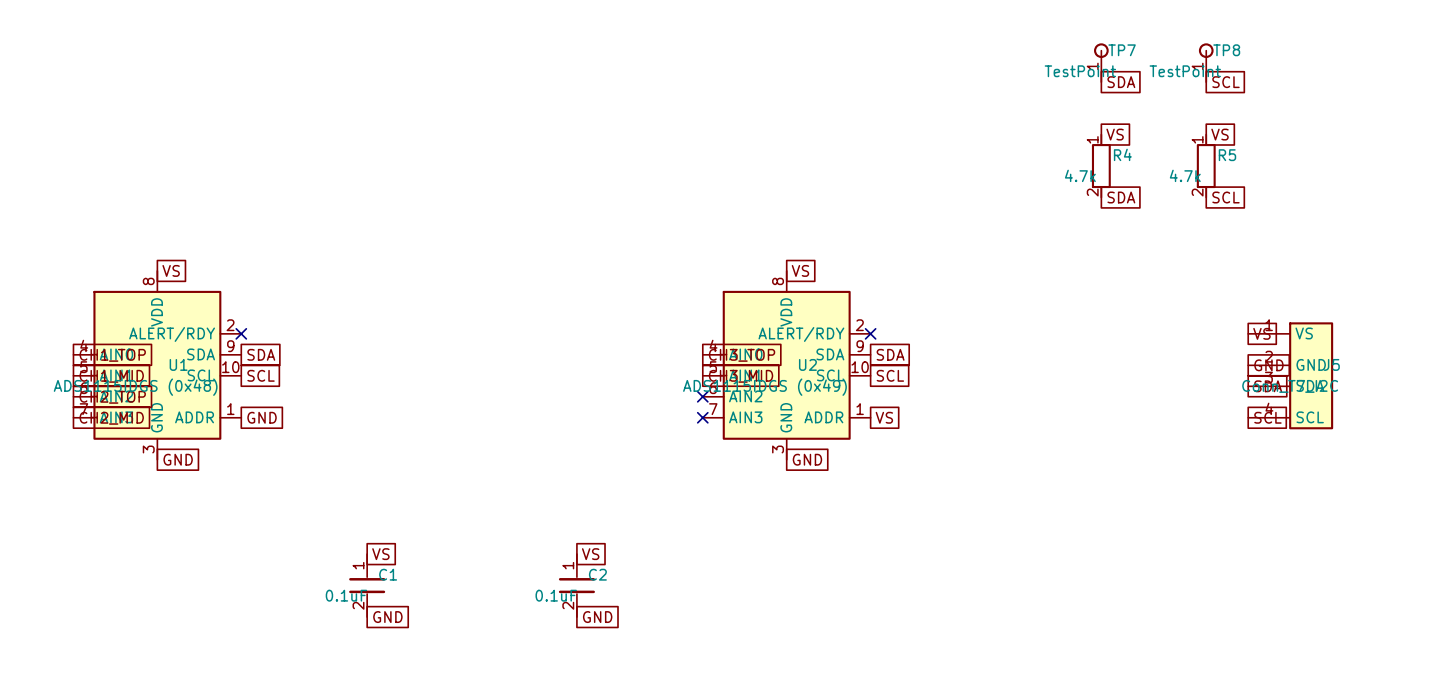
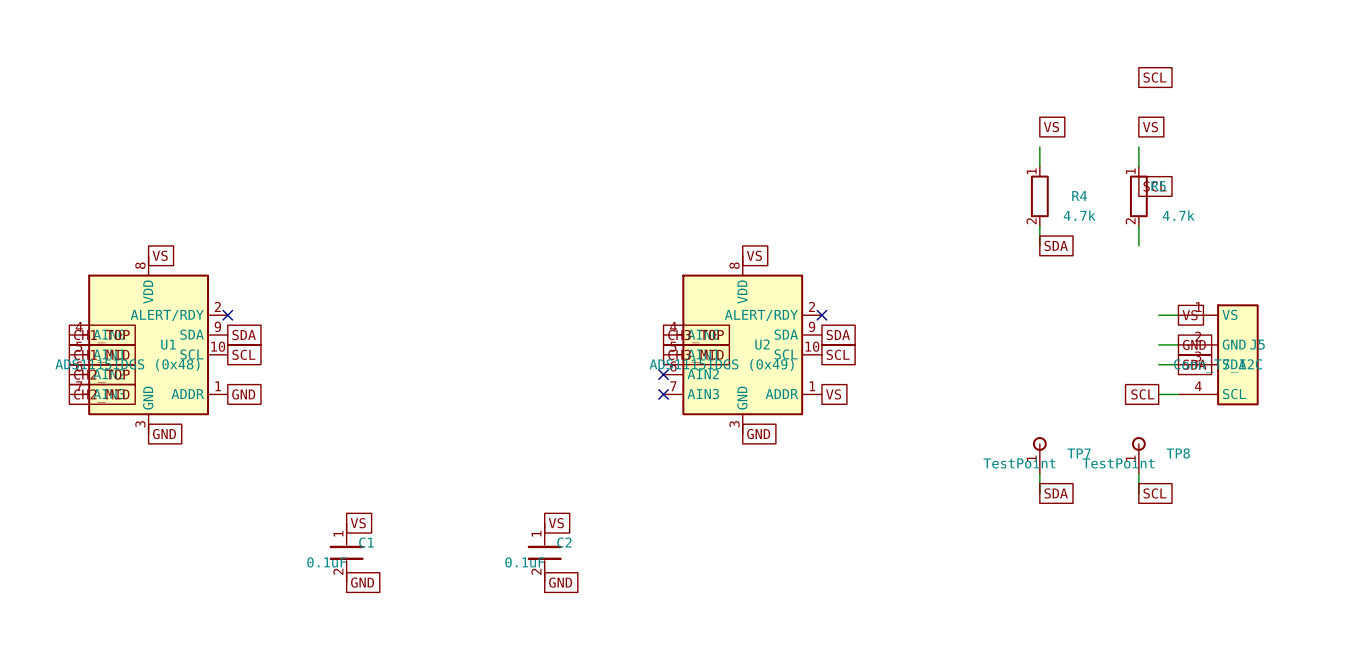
TP7 name position: TP7 (1122, 50) -> TP7 (1079, 453)
TP8 name position: TP8 (1226, 50) -> TP8 (1178, 453)
TP7 position: (1101, 62) -> (1039, 455)
TP8 position: (1206, 62) -> (1138, 455)
global label: SDA (1121, 82) -> none
R4 name position: R4 (1122, 154) -> R4 (1079, 196)
wire: none -> (1039, 146) (1039, 166)
wire: none -> (1138, 146) (1138, 166)
R4 position: (1101, 166) -> (1039, 196)
R5 position: (1206, 166) -> (1138, 196)
R4 value position: 4.7k (1080, 175) -> 4.7k (1079, 215)
R5 value position: 4.7k (1185, 175) -> 4.7k (1178, 215)
global label position: SDA (1121, 197) -> SDA (1056, 245)
wire: none -> (1039, 226) (1039, 245)
wire: none -> (1138, 226) (1138, 245)
wire: none -> (1158, 315) (1178, 315)
wire: none -> (1158, 344) (1178, 344)
wire: none -> (1158, 364) (1178, 364)
wire: none -> (1158, 394) (1178, 394)
global label rotation: 0° (1267, 417) -> 180° (1142, 394)
global label position: SCL (1267, 417) -> SCL (1142, 394)
wire: none -> (1039, 473) (1039, 493)
wire: none -> (1138, 473) (1138, 493)
global label: none -> SDA (1056, 493)
global label: none -> SCL (1155, 493)

